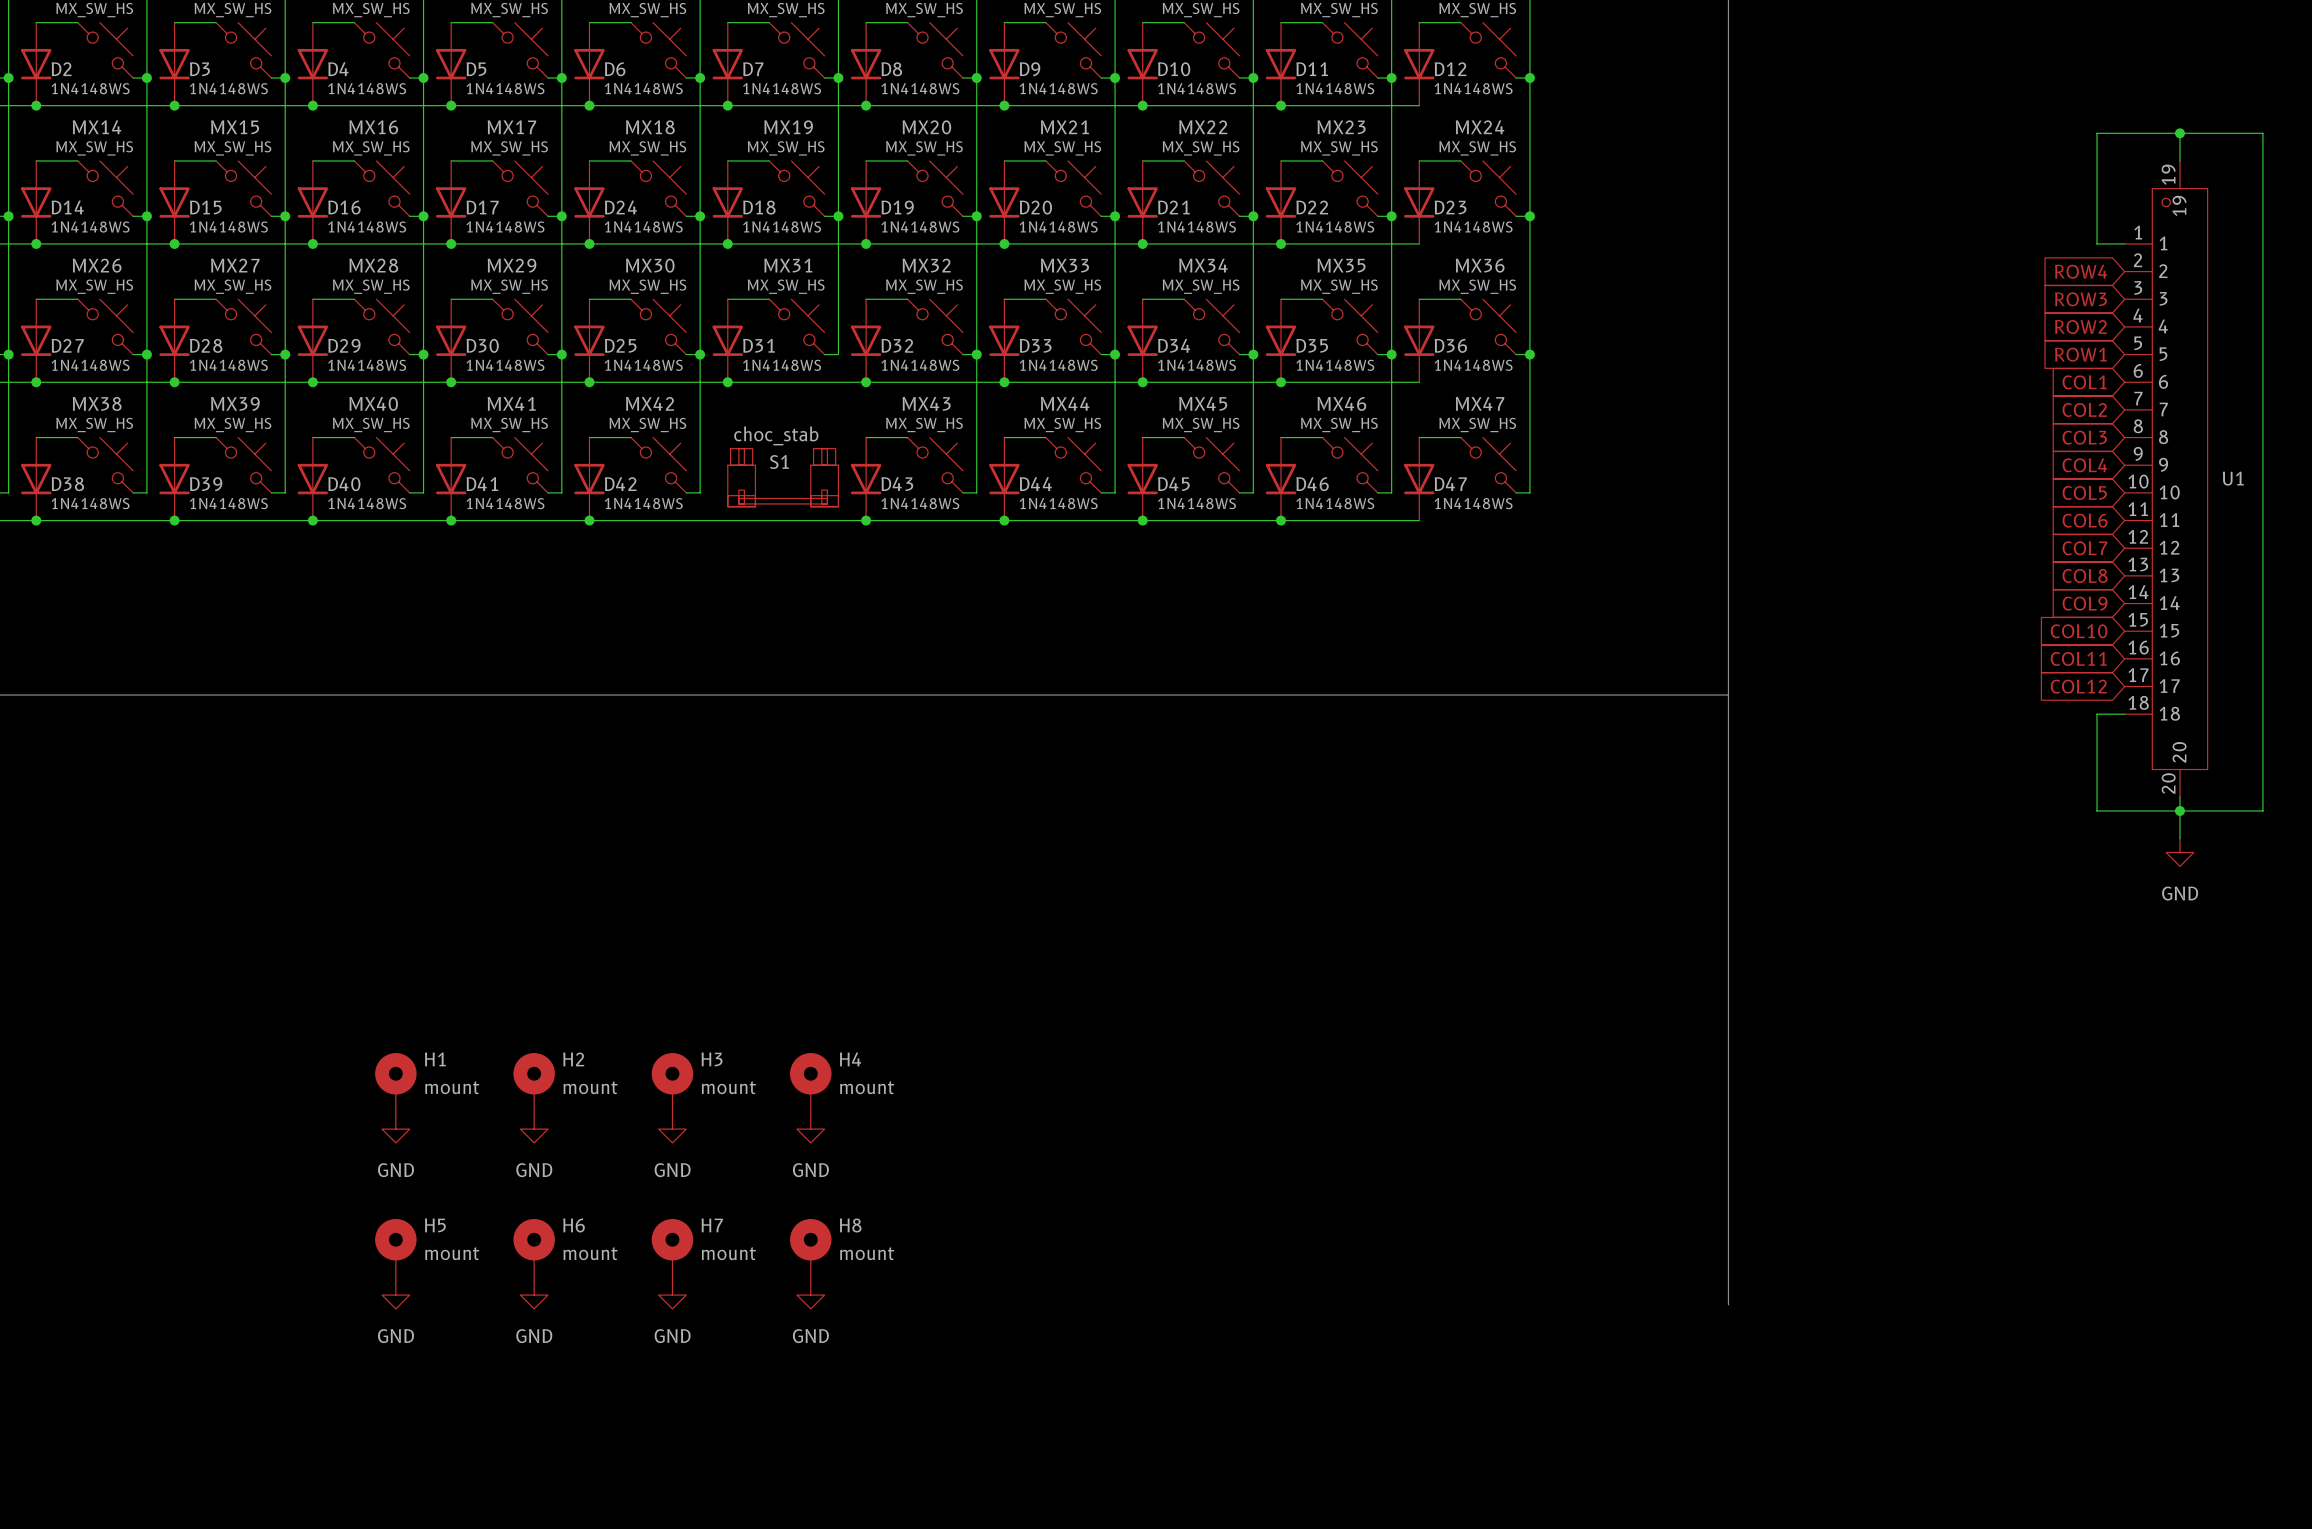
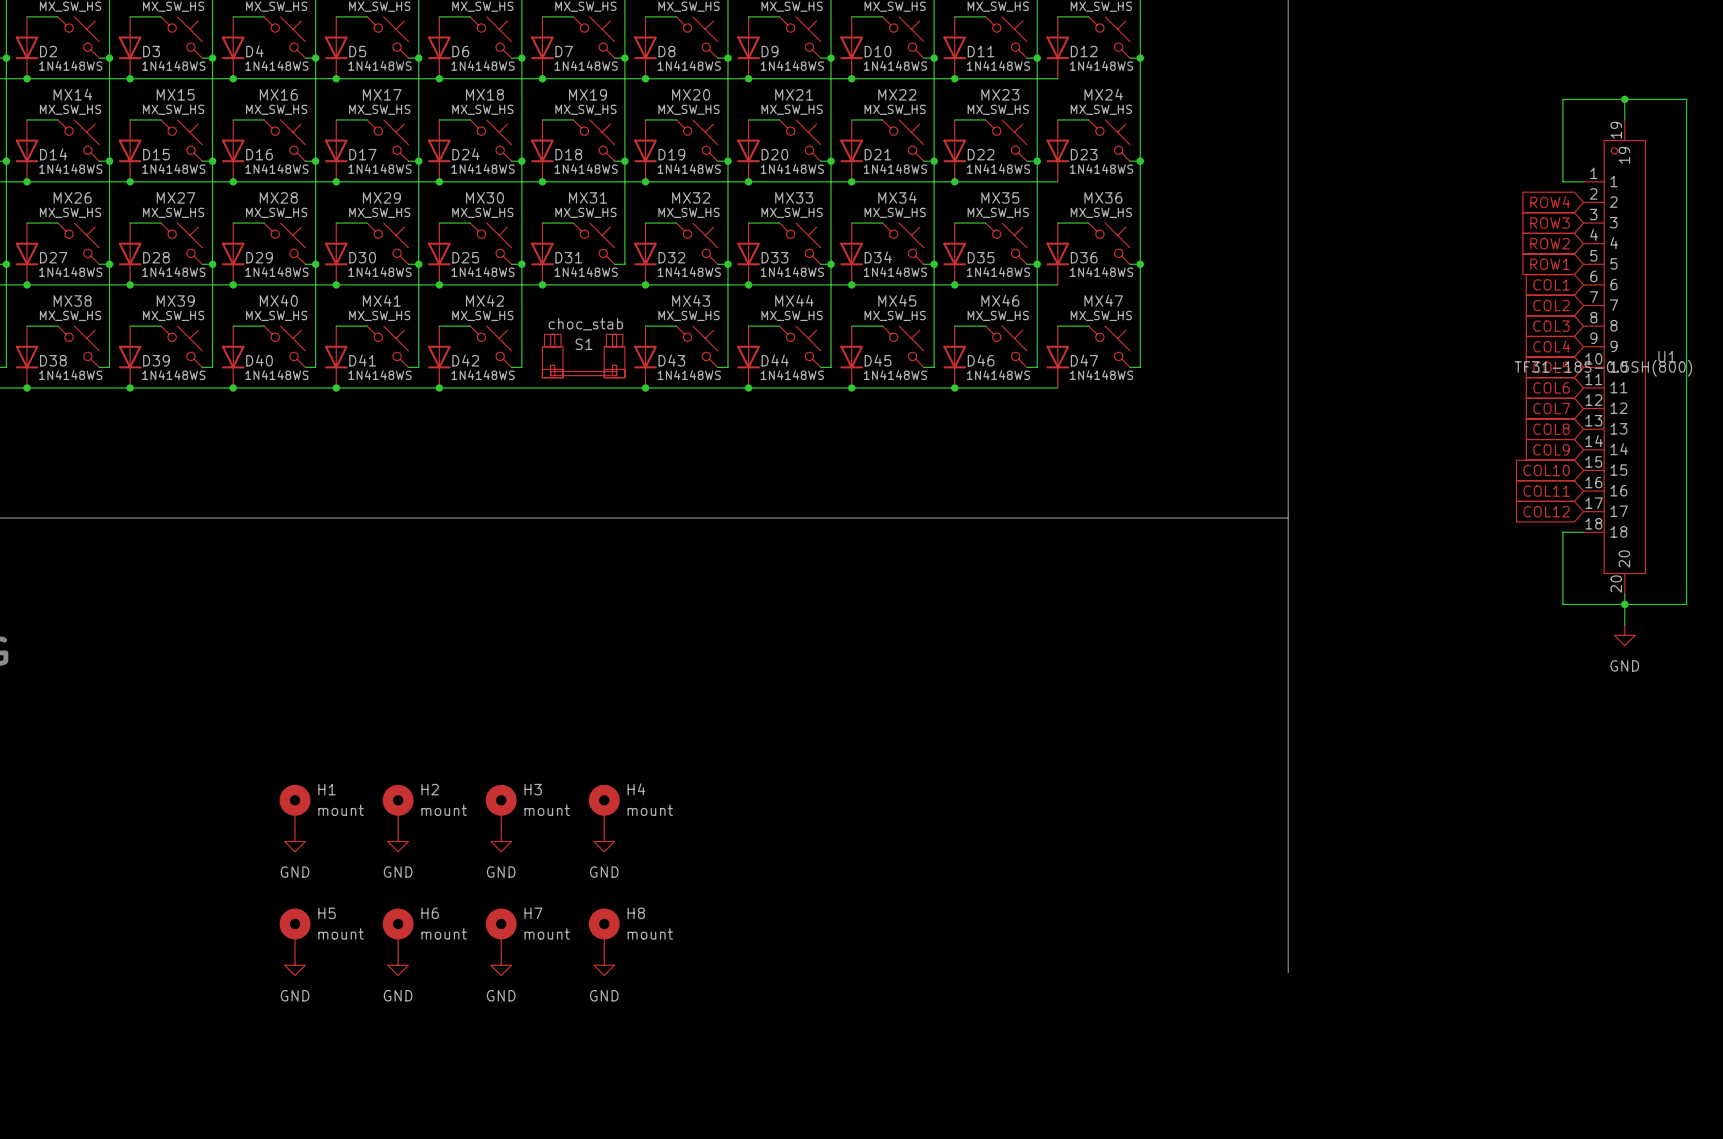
U1 value: none -> TF31-18S-0.5SH(800) (1603, 368)

